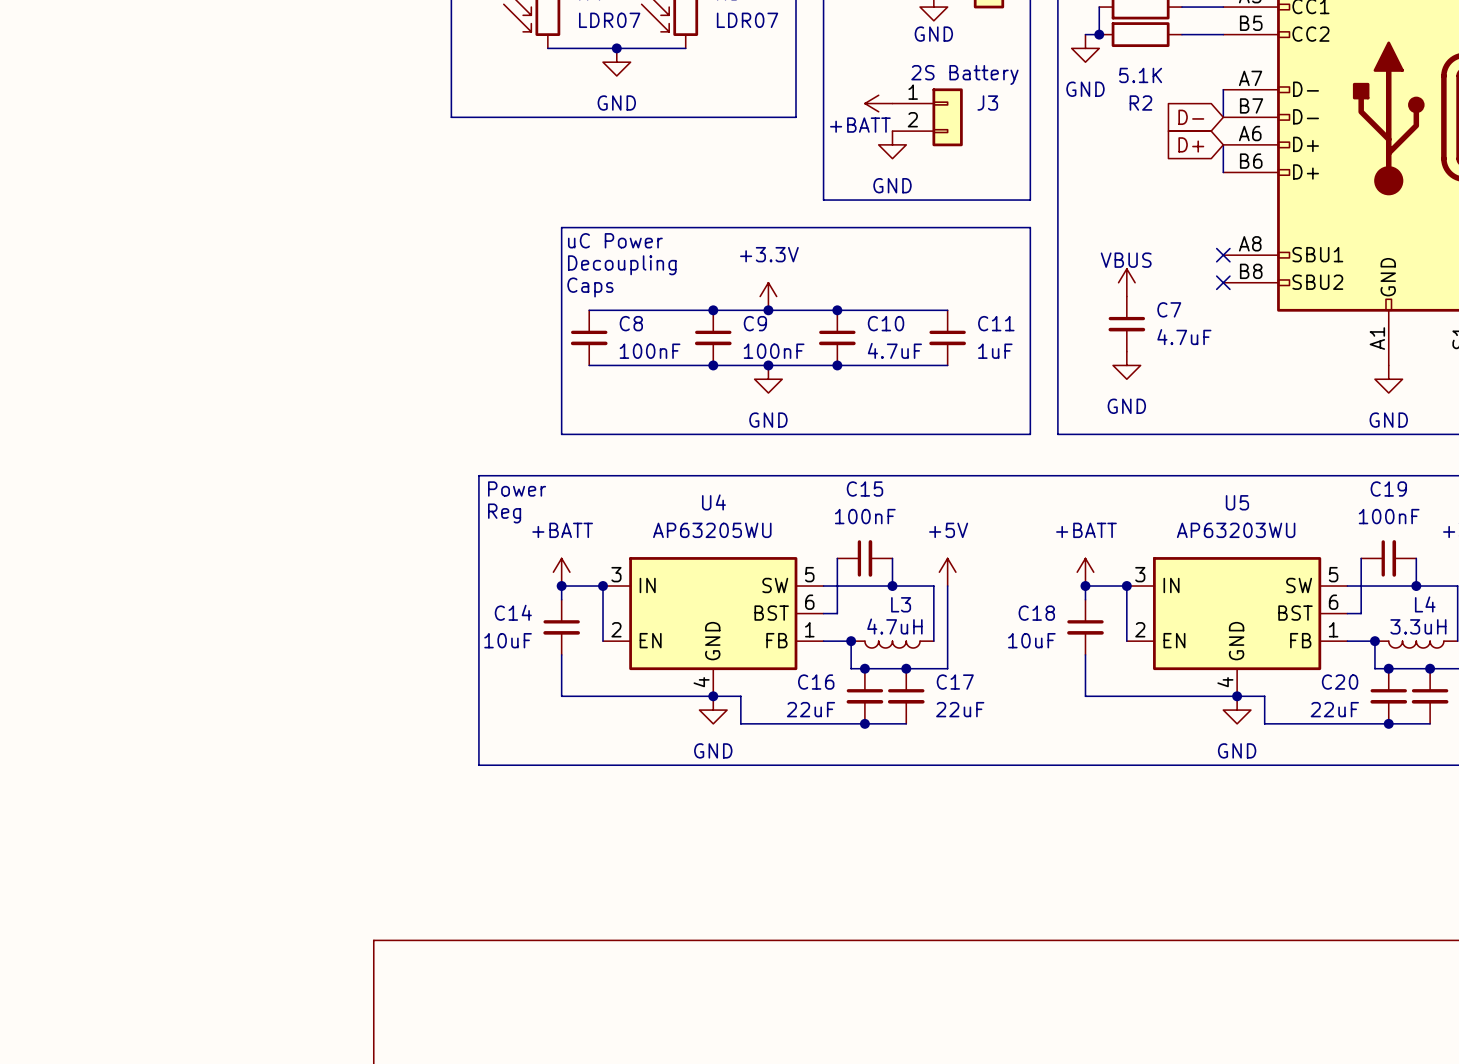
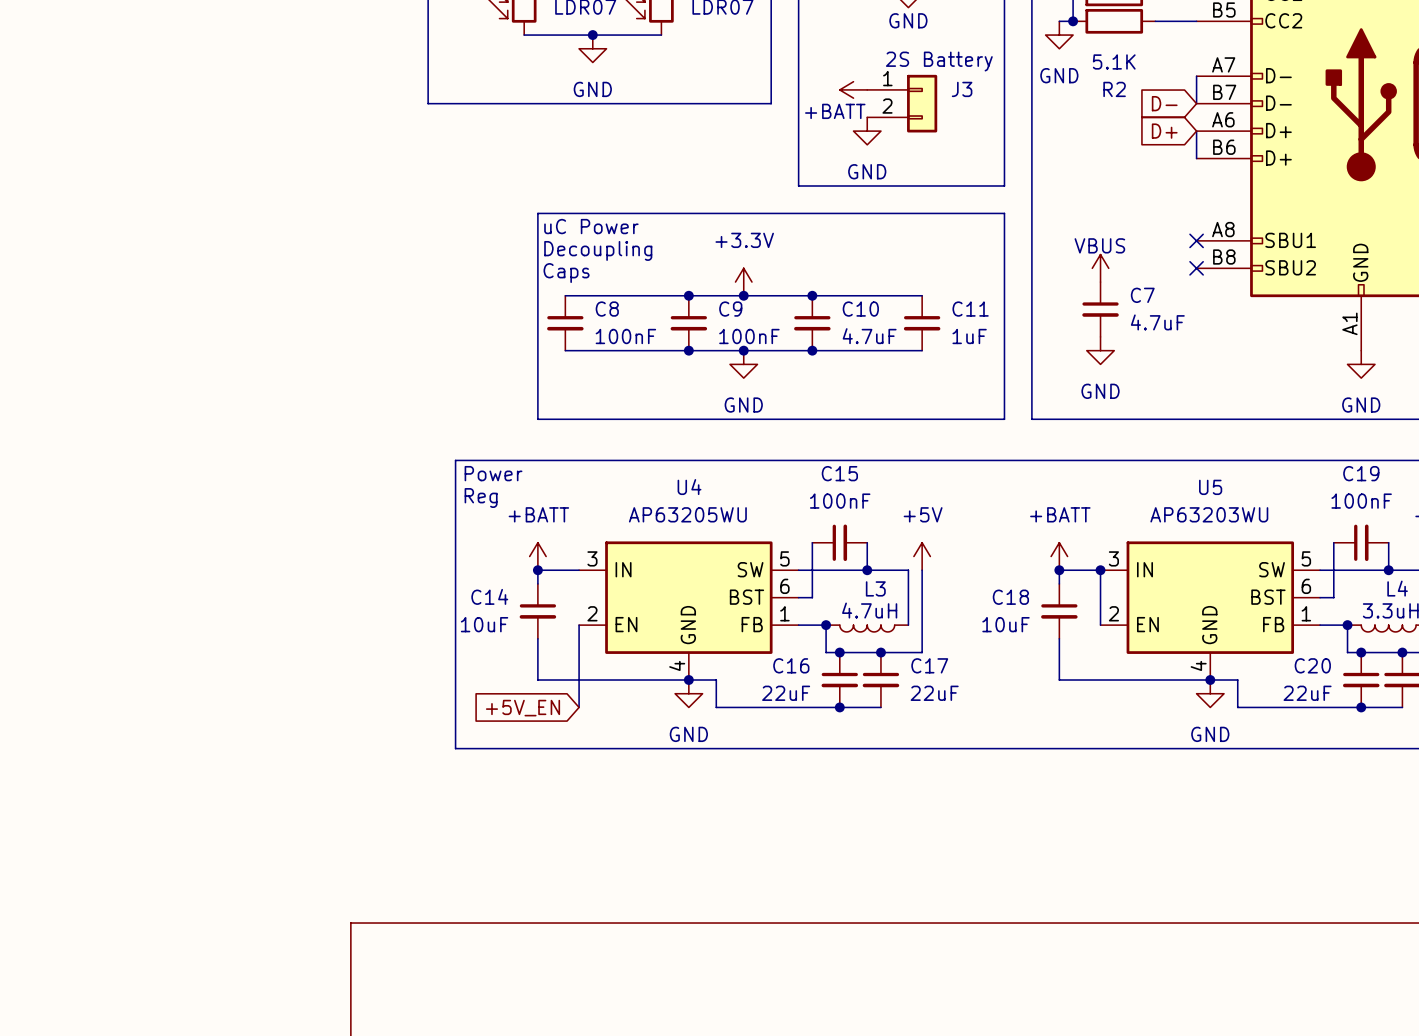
wire: (603, 586) (603, 641) -> (579, 707) (579, 625)
junction: (603, 586) -> none
global label: none -> +5V_EN (523, 708)

